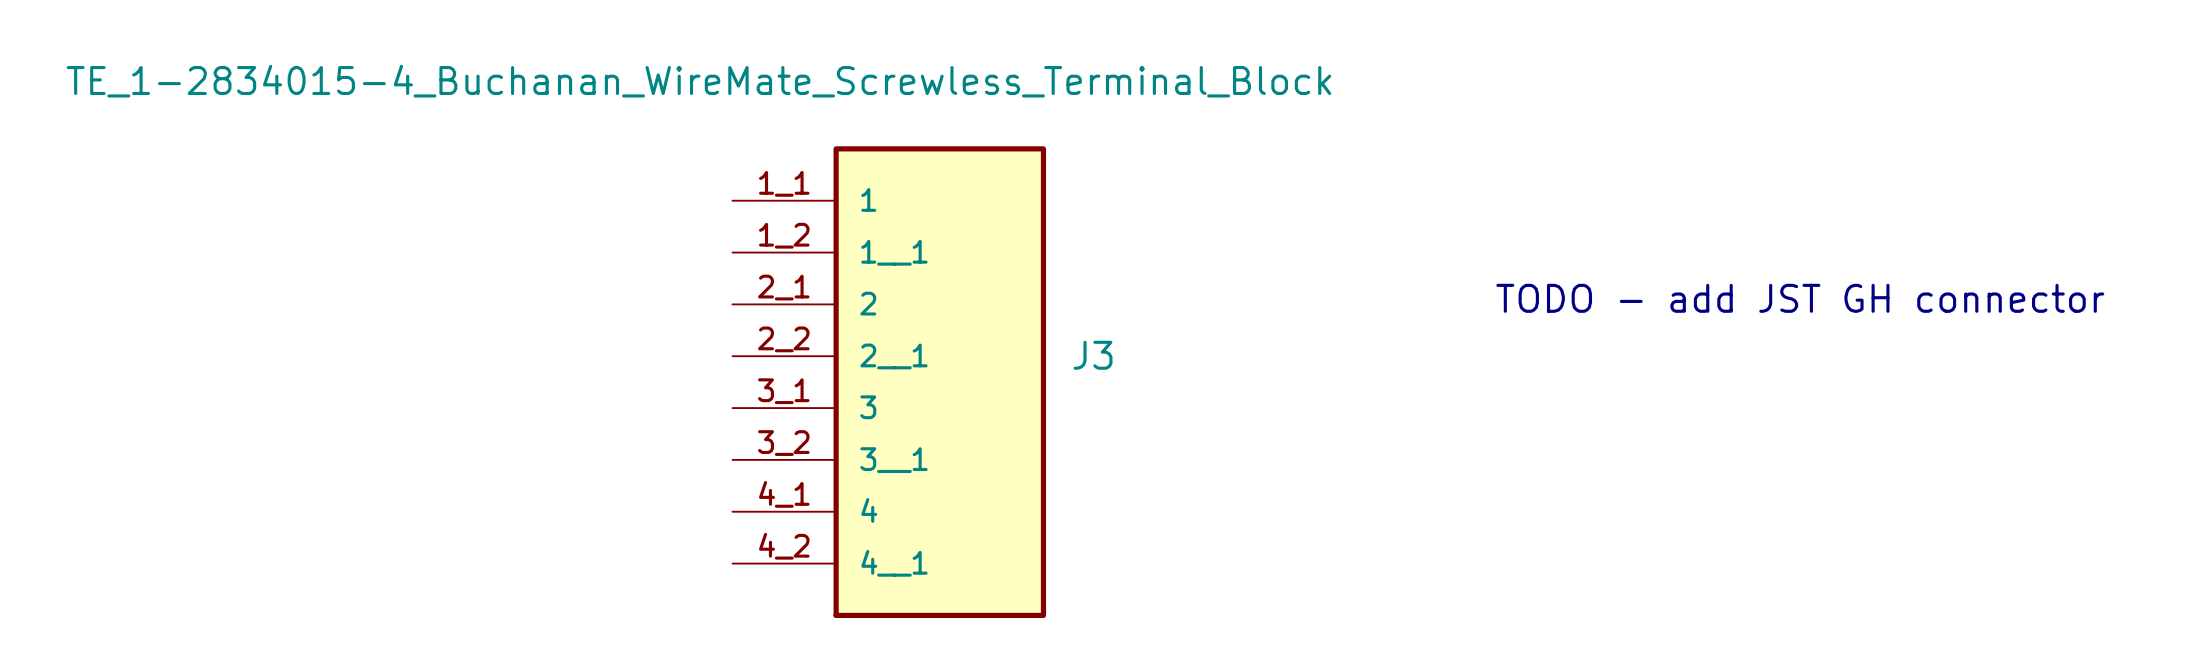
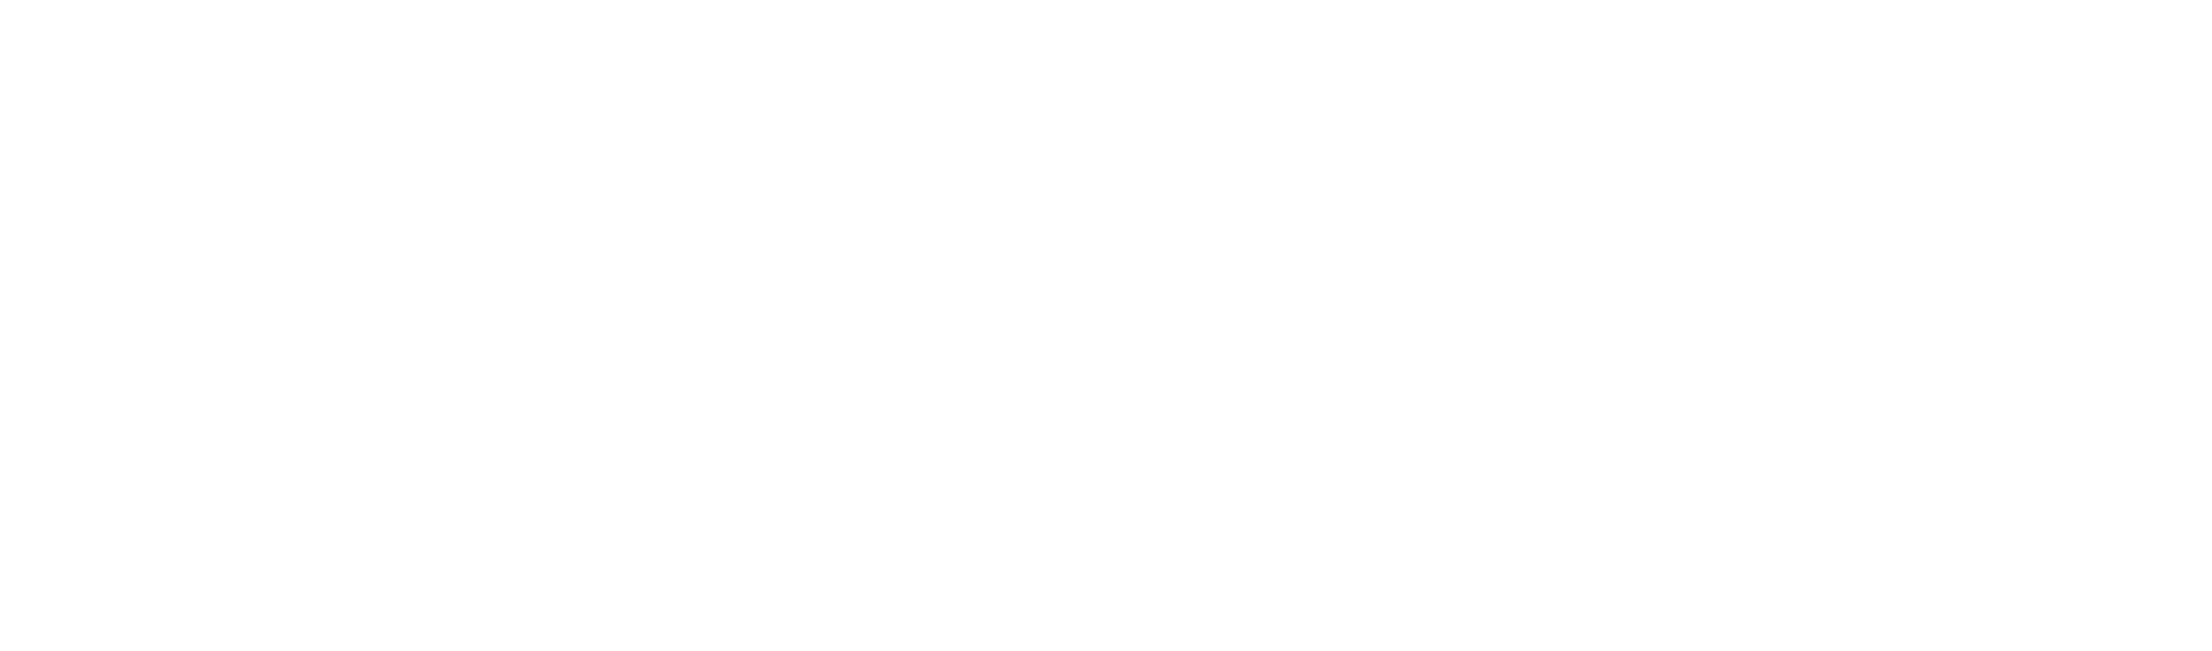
text: TODO - add JST GH connector (1800, 298) -> none
J3: TE_1-2834015-4_Buchanan_WireMate_Screwless_Terminal_Block (889, 382) -> none

